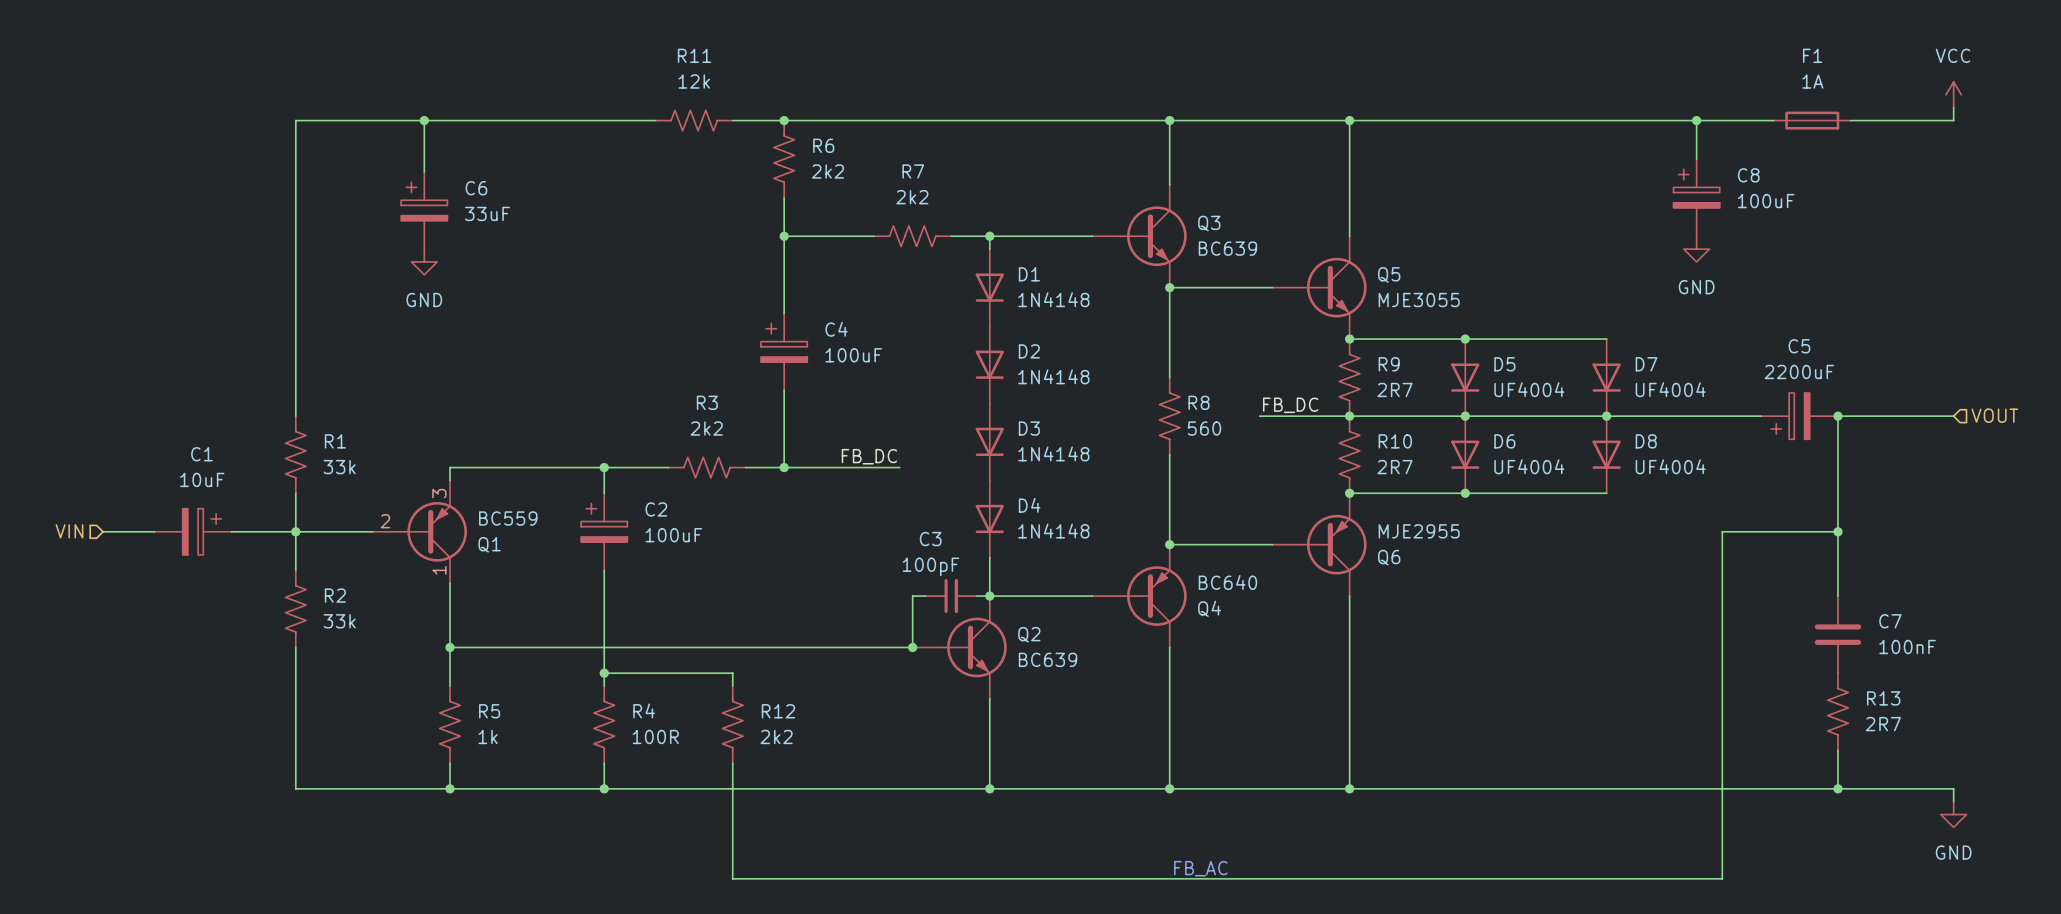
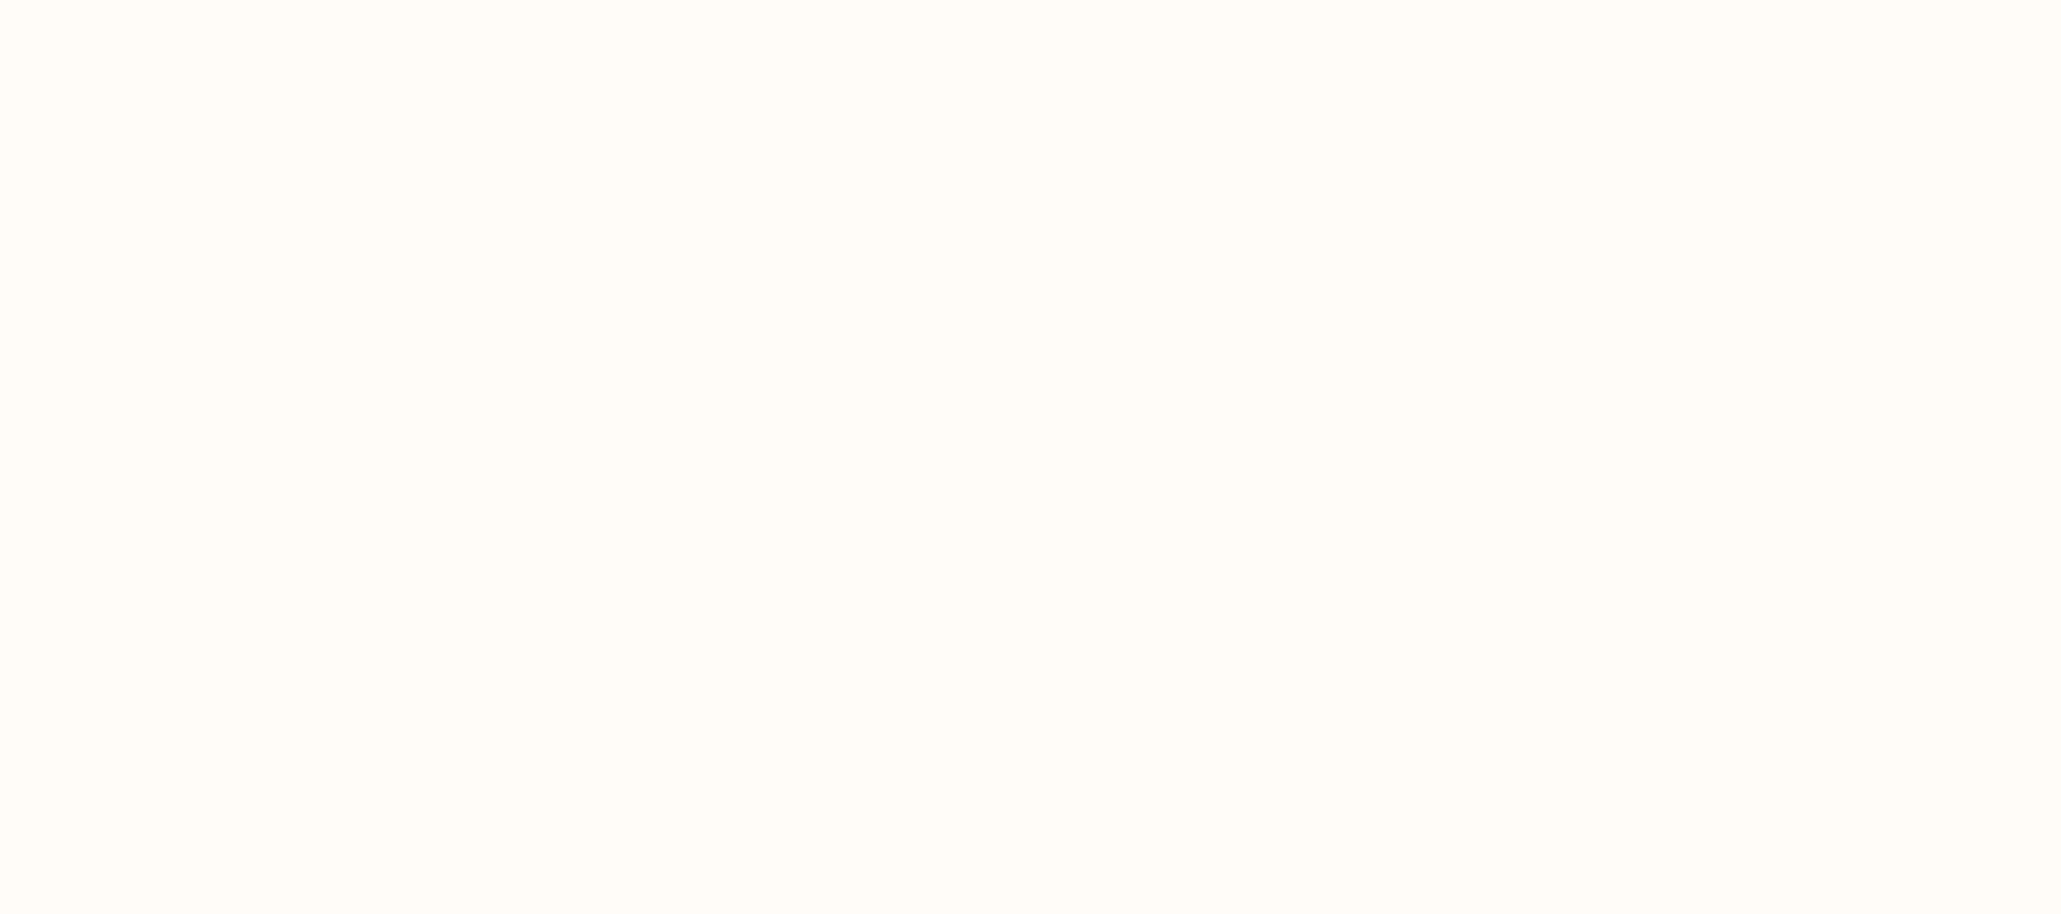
power symbol: VCC (1953, 94) -> none
wire: (1953, 107) (1953, 120) (1850, 120) -> none
wire: (424, 120) (424, 171) -> none
junction: (424, 120) -> none
wire: (655, 120) (295, 120) (295, 416) -> none
R11: 12k (694, 120) -> none
wire: (732, 120) (1773, 120) -> none
junction: (784, 120) -> none
wire: (1169, 120) (1169, 184) -> none
junction: (1169, 120) -> none
wire: (1349, 120) (1349, 236) -> none
junction: (1349, 120) -> none
wire: (1696, 120) (1696, 159) -> none
junction: (1696, 120) -> none
F1: 1A (1812, 120) -> none
R6: 2k2 (784, 159) -> none
wire: (784, 197) (784, 313) -> none
C8: 100uF (1696, 197) -> none
C6: 33uF (424, 210) -> none
wire: (784, 236) (874, 236) -> none
junction: (784, 236) -> none
R7: 2k2 (912, 236) -> none
wire: (951, 236) (1092, 236) -> none
wire: (989, 236) (989, 249) -> none
junction: (989, 236) -> none
Q3: BC639 (1139, 236) -> none
power symbol: GND (1696, 249) -> none
power symbol: GND (424, 261) -> none
D1: 1N4148 (989, 287) -> none
junction: (1169, 287) -> none
wire: (1272, 287) (1169, 287) (1169, 377) -> none
Q5: MJE3055 (1319, 287) -> none
wire: (1349, 339) (1606, 339) -> none
junction: (1349, 339) -> none
junction: (1465, 339) -> none
C4: 100uF (784, 351) -> none
D2: 1N4148 (989, 364) -> none
R9: 2R7 (1349, 377) -> none
D5: UF4004 (1465, 377) -> none
D7: UF4004 (1606, 377) -> none
wire: (784, 390) (784, 467) -> none
label: FB_DC (1290, 405) -> none
hierarchical label: VOUT (1994, 415) -> none
R8: 560 (1169, 416) -> none
wire: (1259, 416) (1760, 416) -> none
junction: (1349, 416) -> none
junction: (1465, 416) -> none
junction: (1606, 416) -> none
C5: 2200uF (1799, 416) -> none
junction: (1837, 416) -> none
wire: (1953, 416) (1837, 416) (1837, 596) -> none
D3: 1N4148 (989, 441) -> none
R1: 33k (295, 454) -> none
wire: (1169, 454) (1169, 544) (1272, 544) -> none
R10: 2R7 (1349, 454) -> none
D6: UF4004 (1465, 454) -> none
D8: UF4004 (1606, 454) -> none
label: FB_DC (869, 456) -> none
wire: (604, 467) (604, 493) -> none
junction: (604, 467) -> none
wire: (668, 467) (450, 467) (450, 480) -> none
R3: 2k2 (707, 467) -> none
wire: (745, 467) (899, 467) -> none
junction: (784, 467) -> none
wire: (295, 493) (295, 570) -> none
wire: (1349, 493) (1606, 493) -> none
junction: (1349, 493) -> none
junction: (1465, 493) -> none
D4: 1N4148 (989, 518) -> none
hierarchical label: VIN (69, 531) -> none
wire: (103, 531) (154, 531) -> none
C1: 10uF (192, 531) -> none
wire: (231, 531) (372, 531) -> none
junction: (295, 531) -> none
Q1: BC559 (419, 531) -> none
C2: 100uF (604, 531) -> none
wire: (1837, 531) (1722, 531) (1722, 878) (732, 878) (732, 763) -> none
junction: (1837, 531) -> none
junction: (1169, 544) -> none
Q6: MJE2955 (1319, 544) -> none
wire: (989, 557) (989, 596) -> none
wire: (604, 570) (604, 686) -> none
wire: (450, 583) (450, 686) -> none
wire: (925, 596) (912, 596) (912, 647) (450, 647) -> none
C3: 100pF (951, 596) -> none
wire: (976, 596) (1092, 596) -> none
junction: (989, 596) -> none
Q4: BC640 (1139, 596) -> none
wire: (1349, 596) (1349, 788) -> none
R2: 33k (295, 608) -> none
C7: 100nF (1837, 634) -> none
wire: (295, 647) (295, 788) (1953, 788) (1953, 801) -> none
junction: (450, 647) -> none
junction: (912, 647) -> none
Q2: BC639 (959, 647) -> none
wire: (1169, 647) (1169, 788) -> none
wire: (604, 673) (732, 673) (732, 686) -> none
junction: (604, 673) -> none
wire: (989, 698) (989, 788) -> none
R13: 2R7 (1837, 711) -> none
R5: 1k (450, 724) -> none
R4: 100R (604, 724) -> none
R12: 2k2 (732, 724) -> none
wire: (1837, 750) (1837, 788) -> none
wire: (450, 763) (450, 788) -> none
wire: (604, 763) (604, 788) -> none
junction: (450, 788) -> none
junction: (604, 788) -> none
junction: (989, 788) -> none
junction: (1169, 788) -> none
junction: (1349, 788) -> none
junction: (1837, 788) -> none
power symbol: GND (1953, 814) -> none
text: FB_AC (1200, 868) -> none

